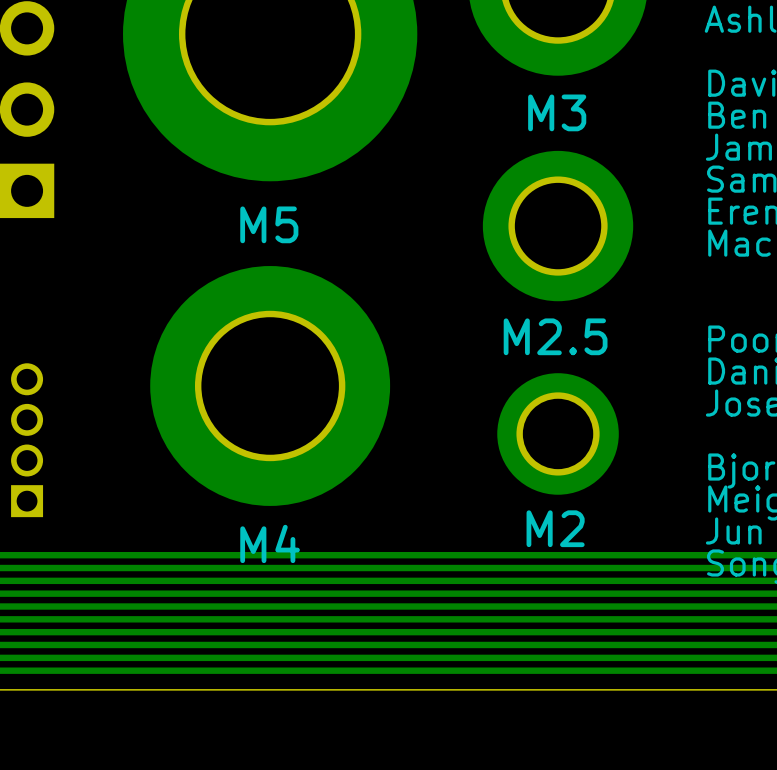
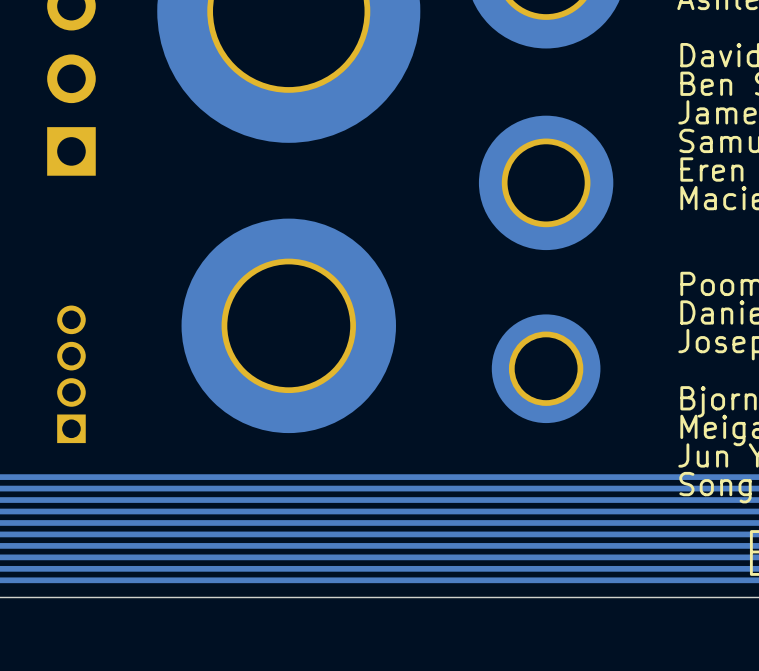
text: M3 (557, 112) -> none
text: M5 (269, 224) -> none
text: M2.5 (555, 336) -> none
text: M2 (555, 528) -> none
text: M4 (270, 543) -> none

